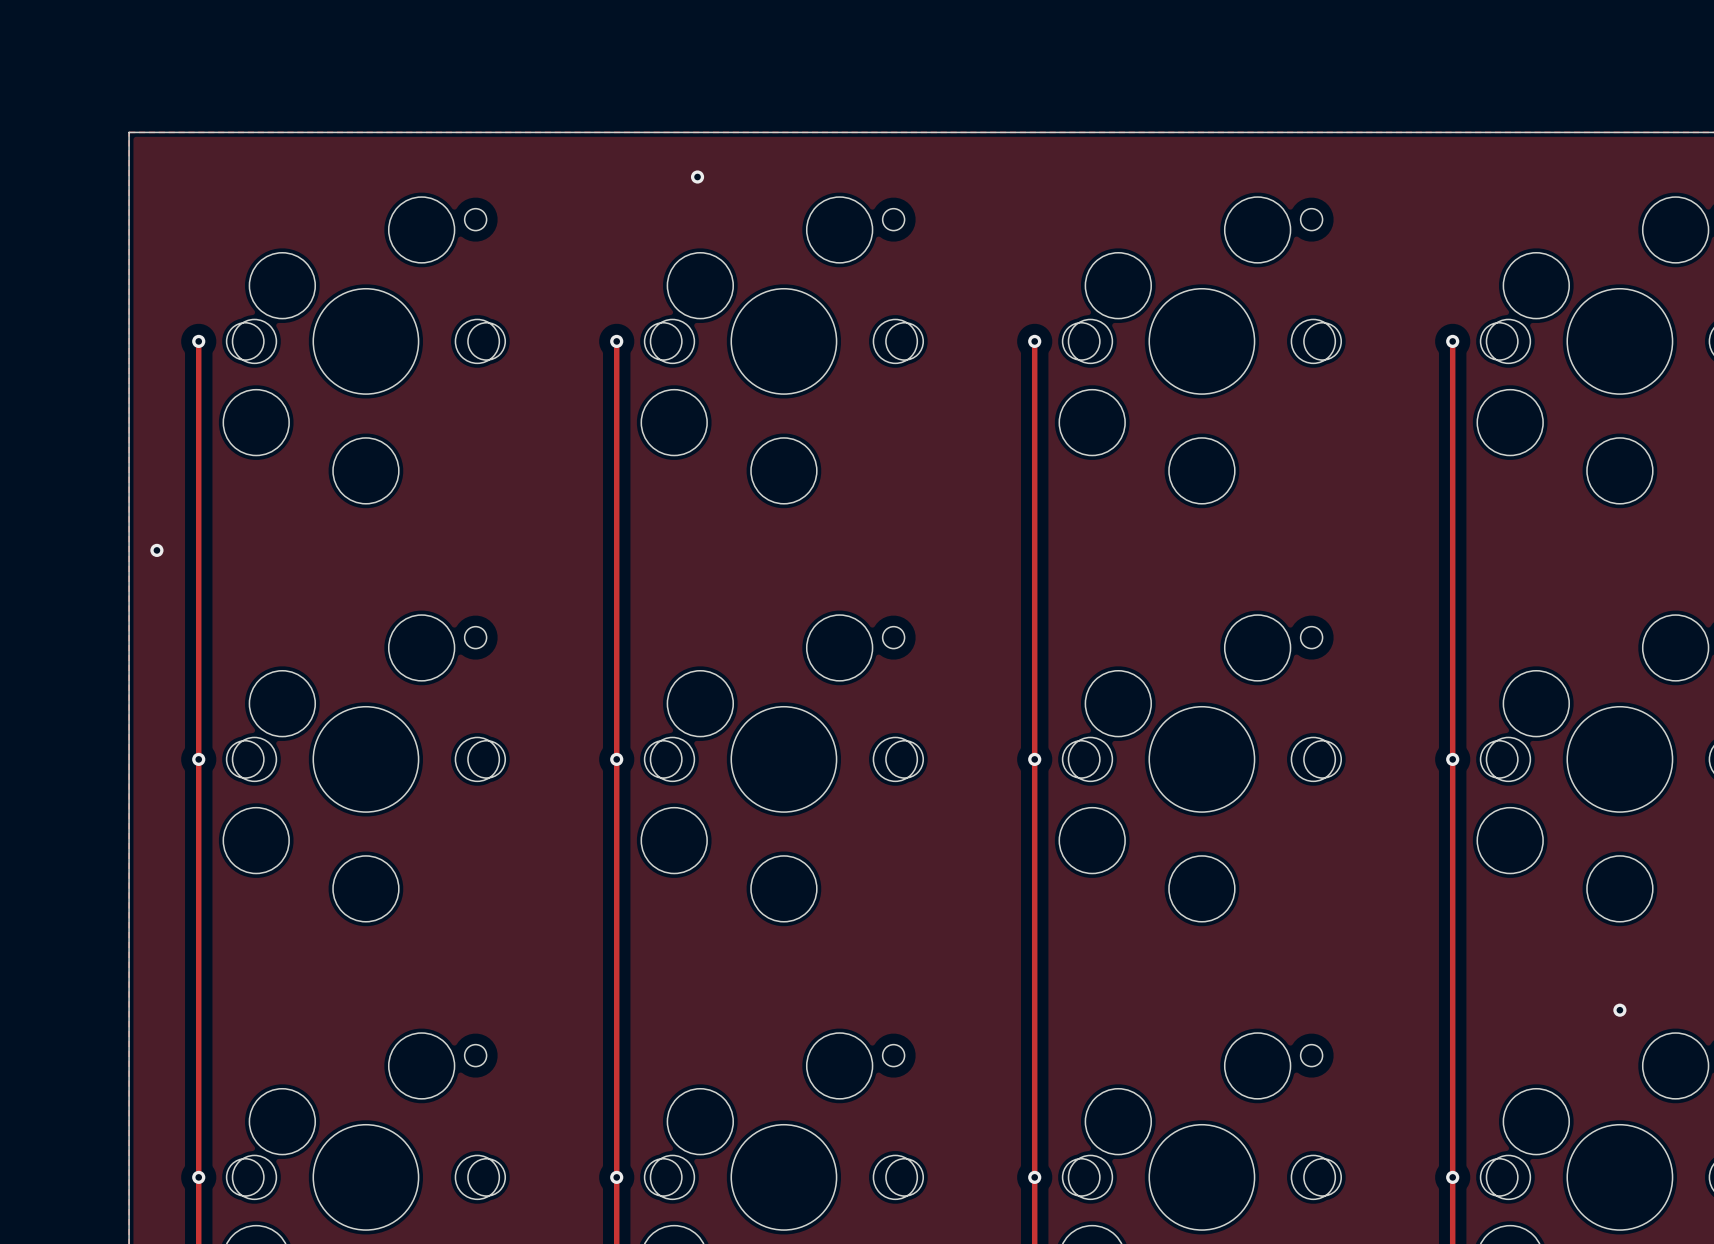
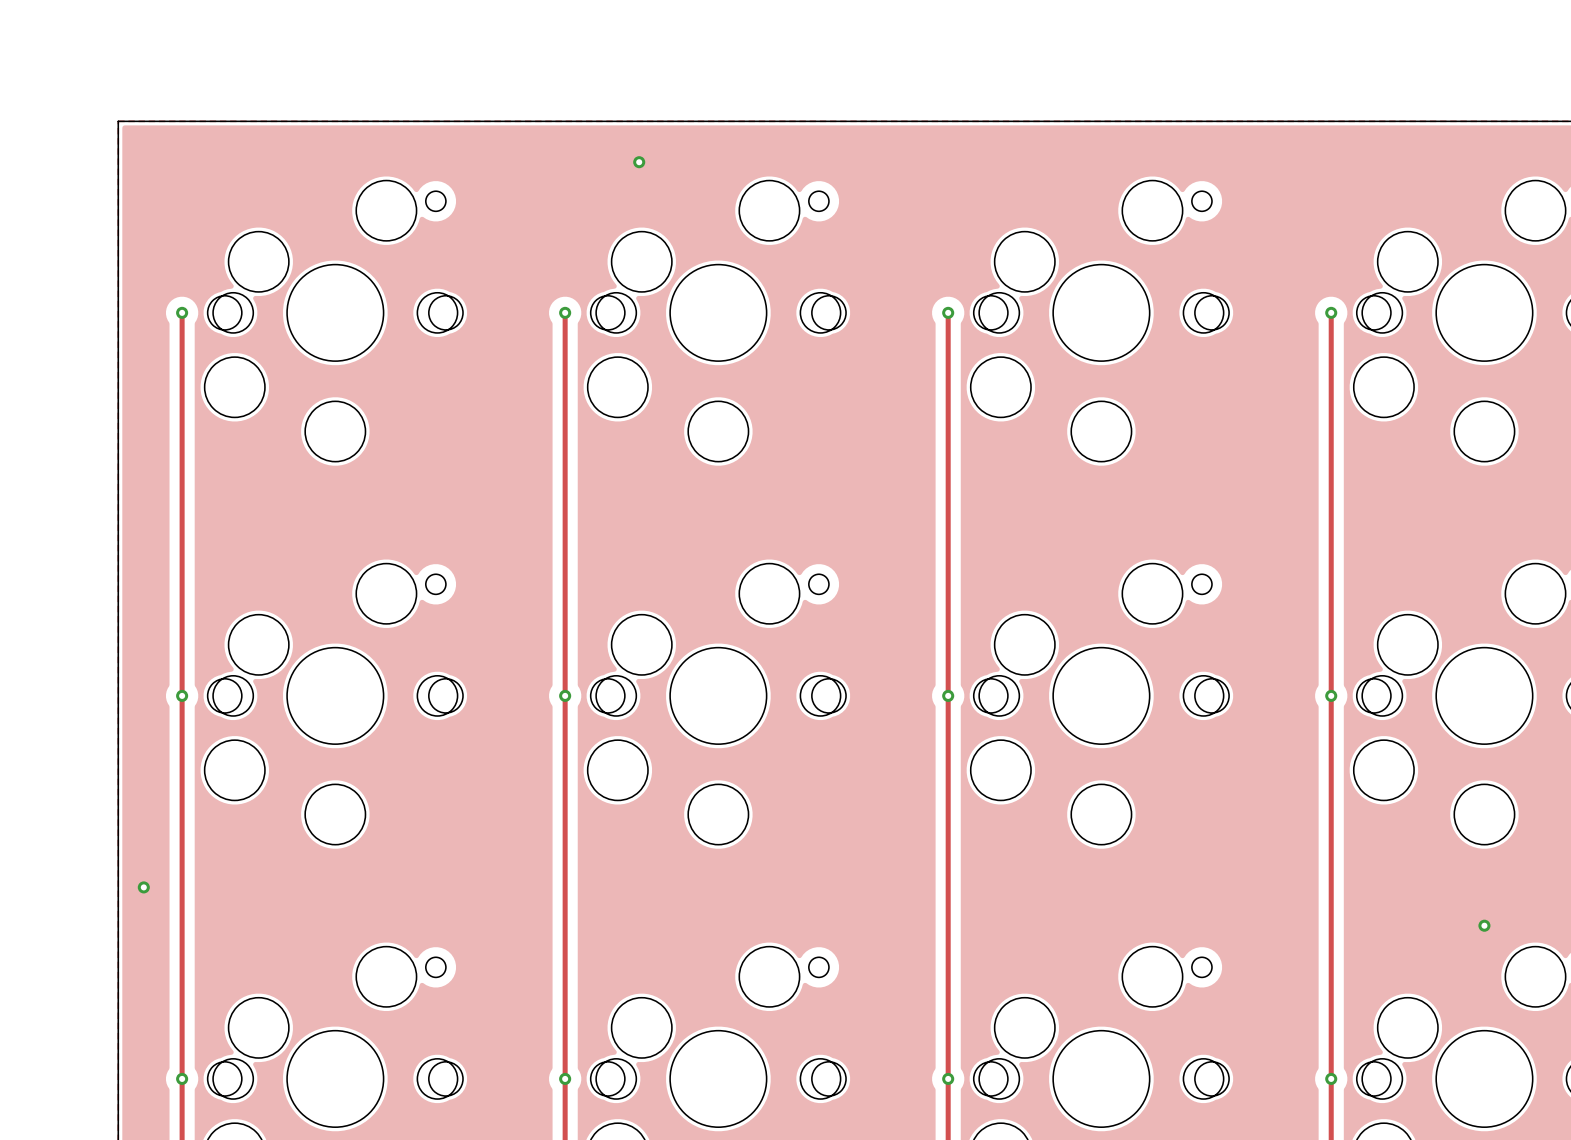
via: (156, 550) -> none
via: none -> (143, 887)

